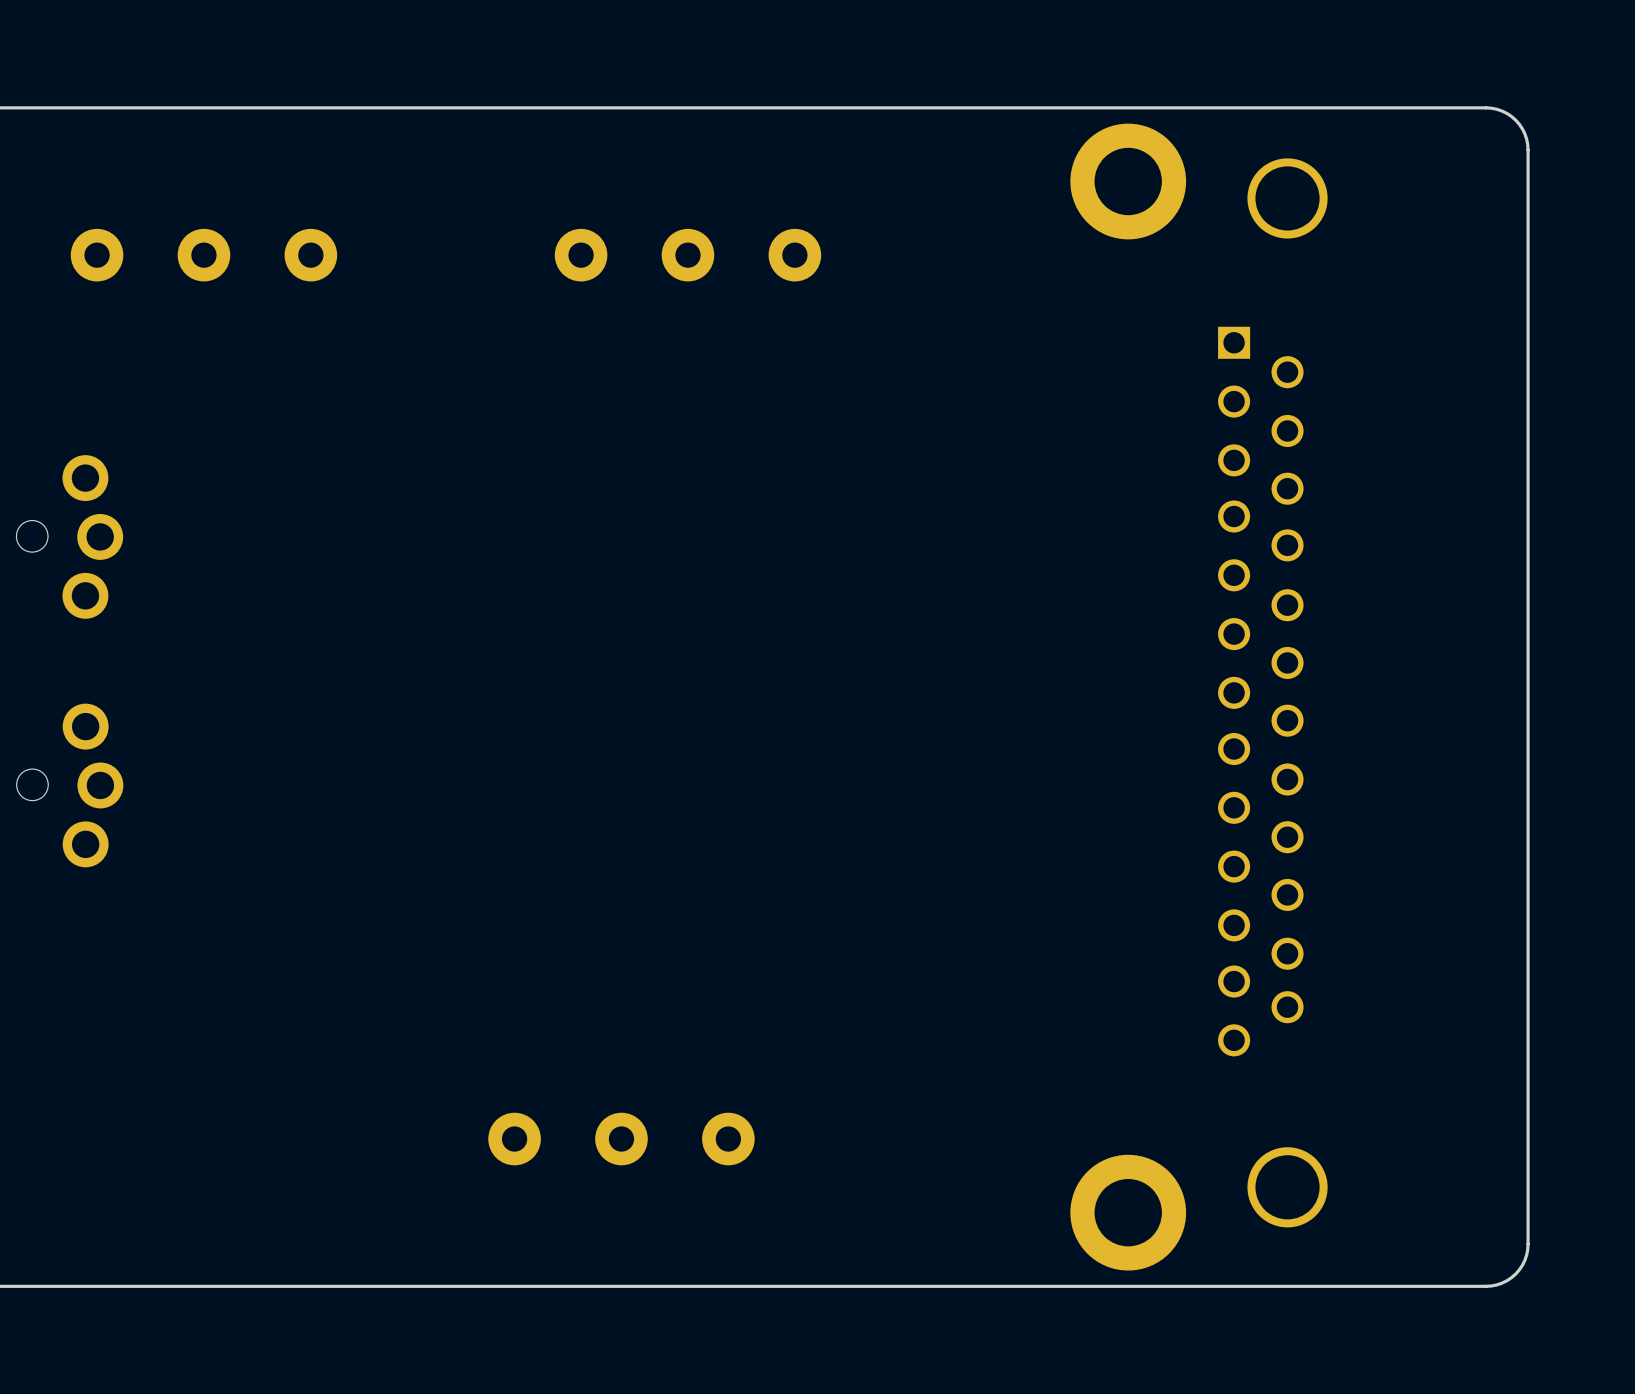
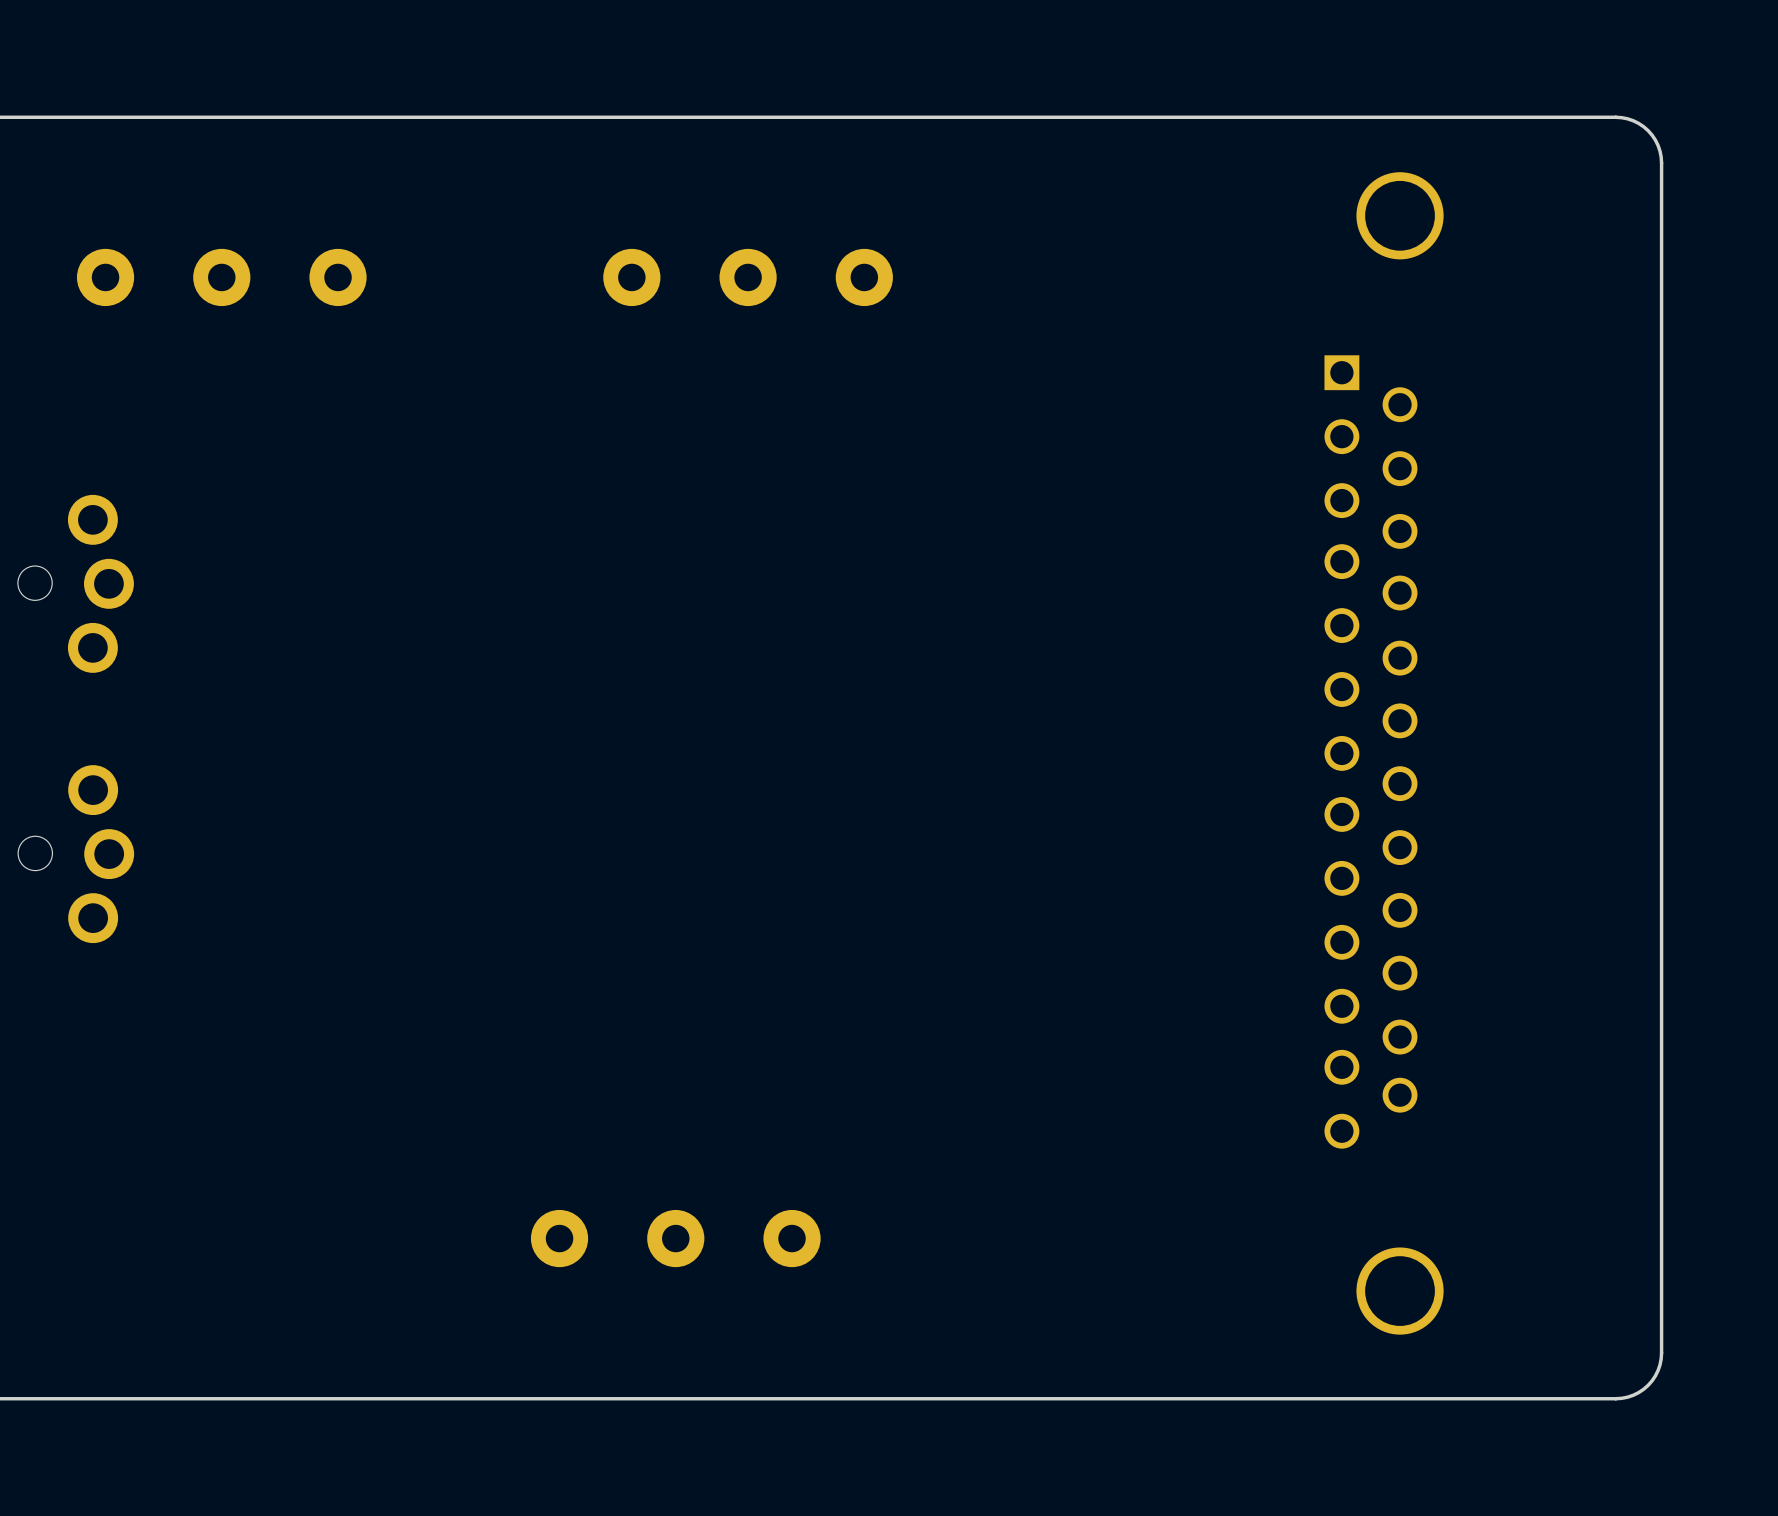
part: (1128, 181) -> none
part: (1128, 1212) -> none

